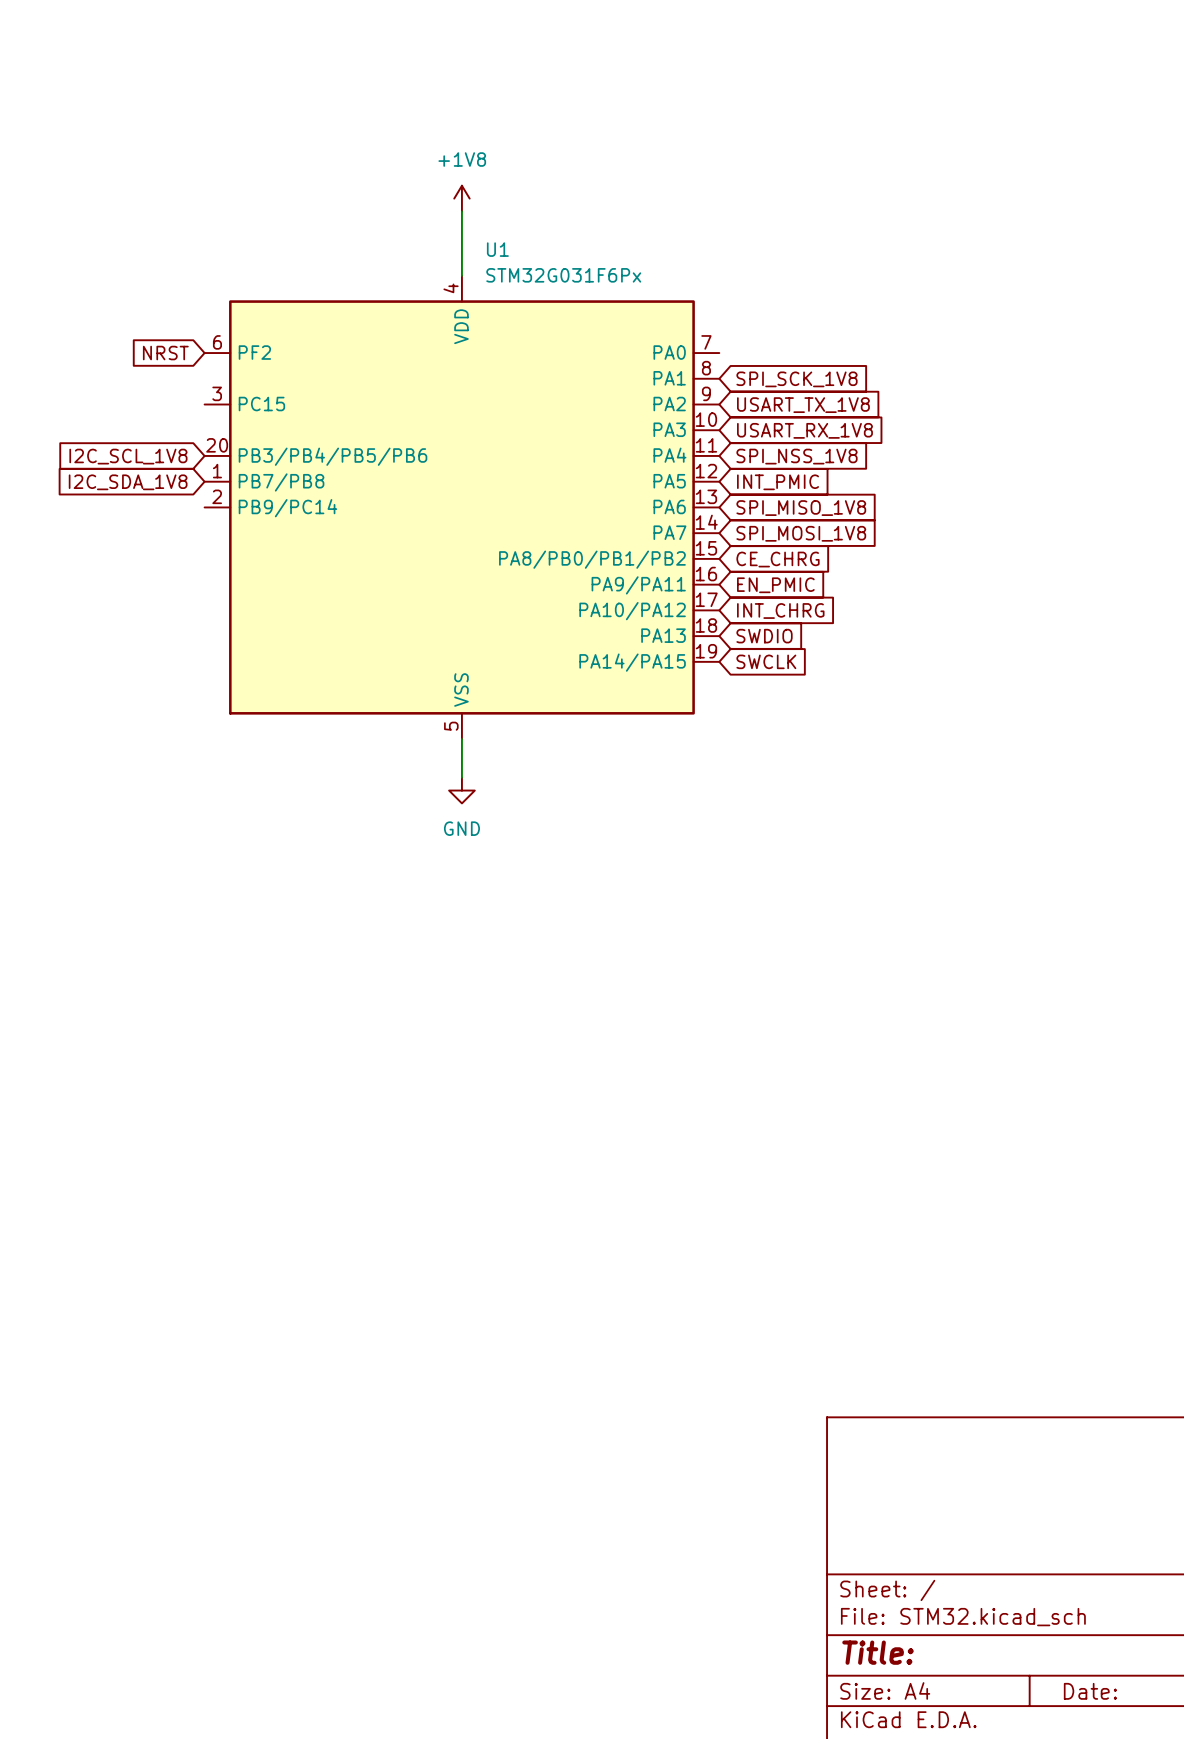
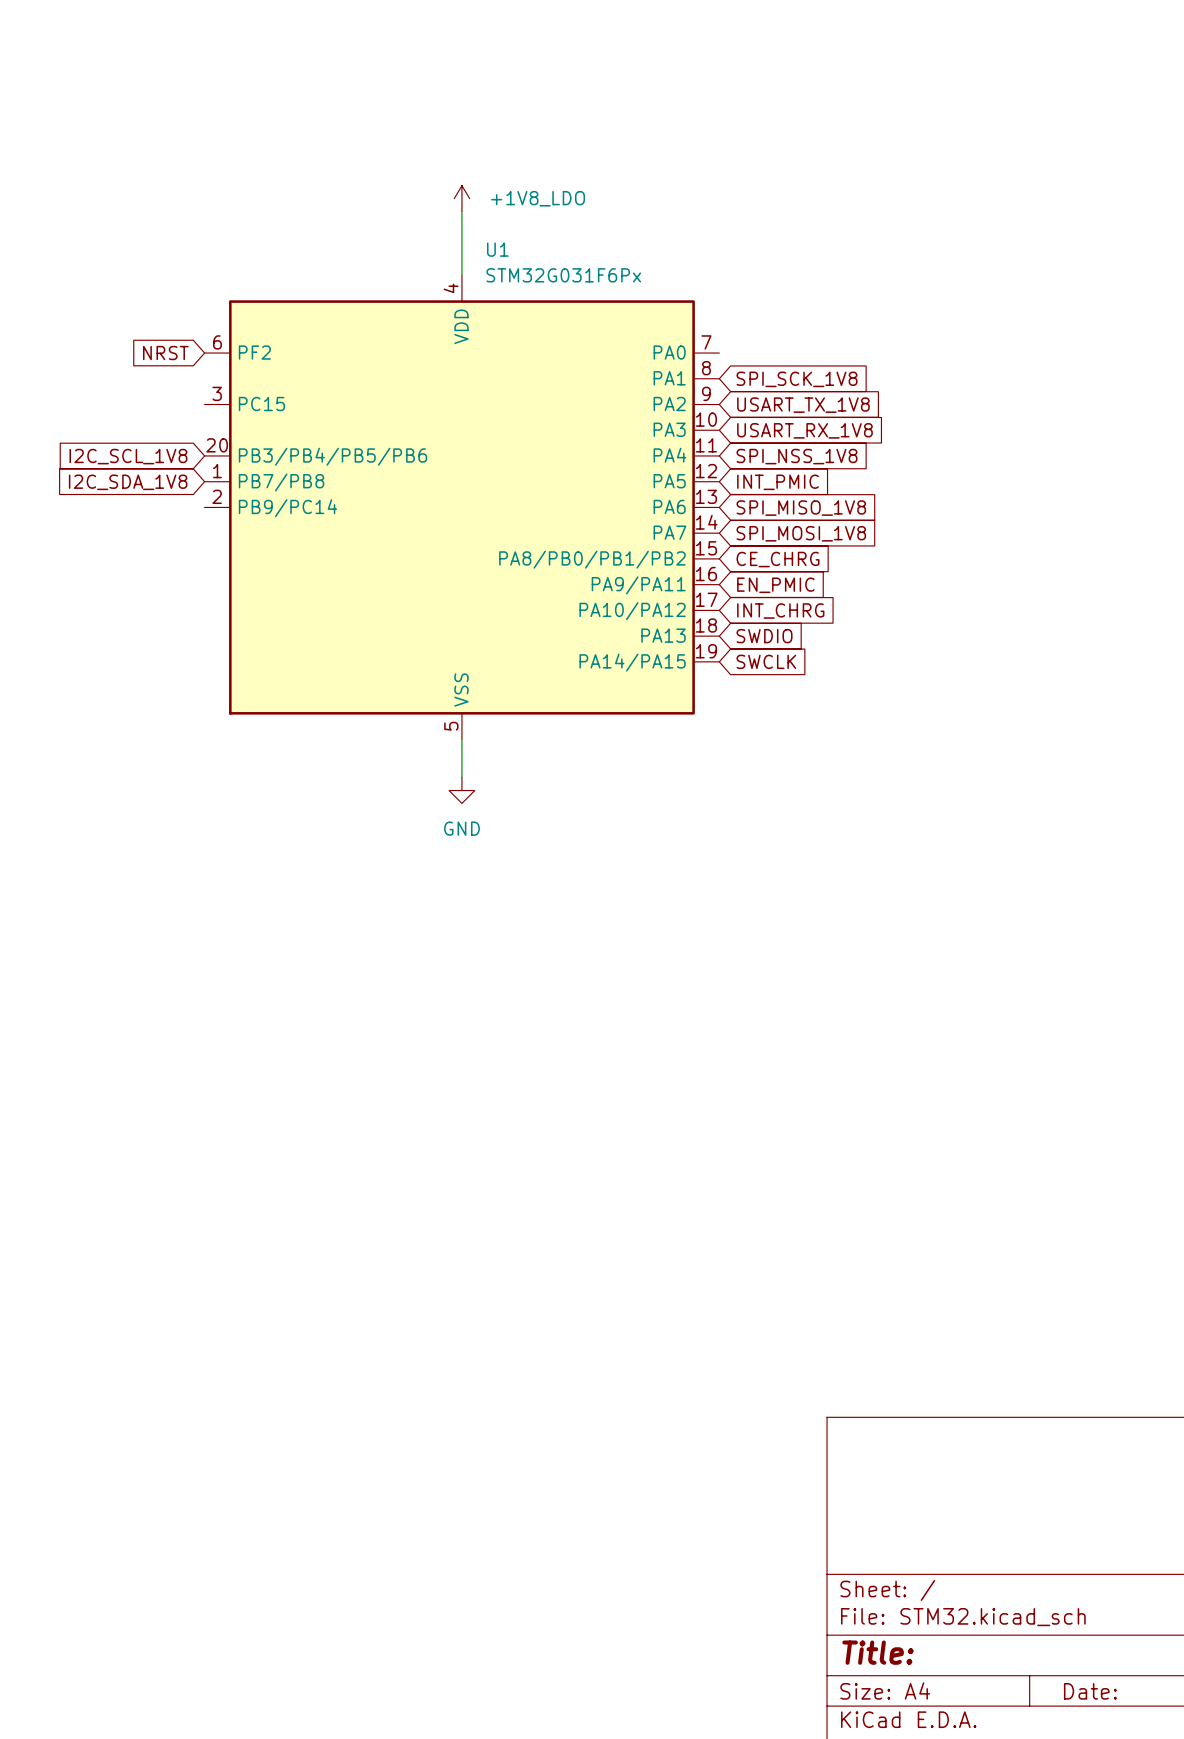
power symbol: +1V8 (461, 198) -> +1V8_LDO (461, 198)

